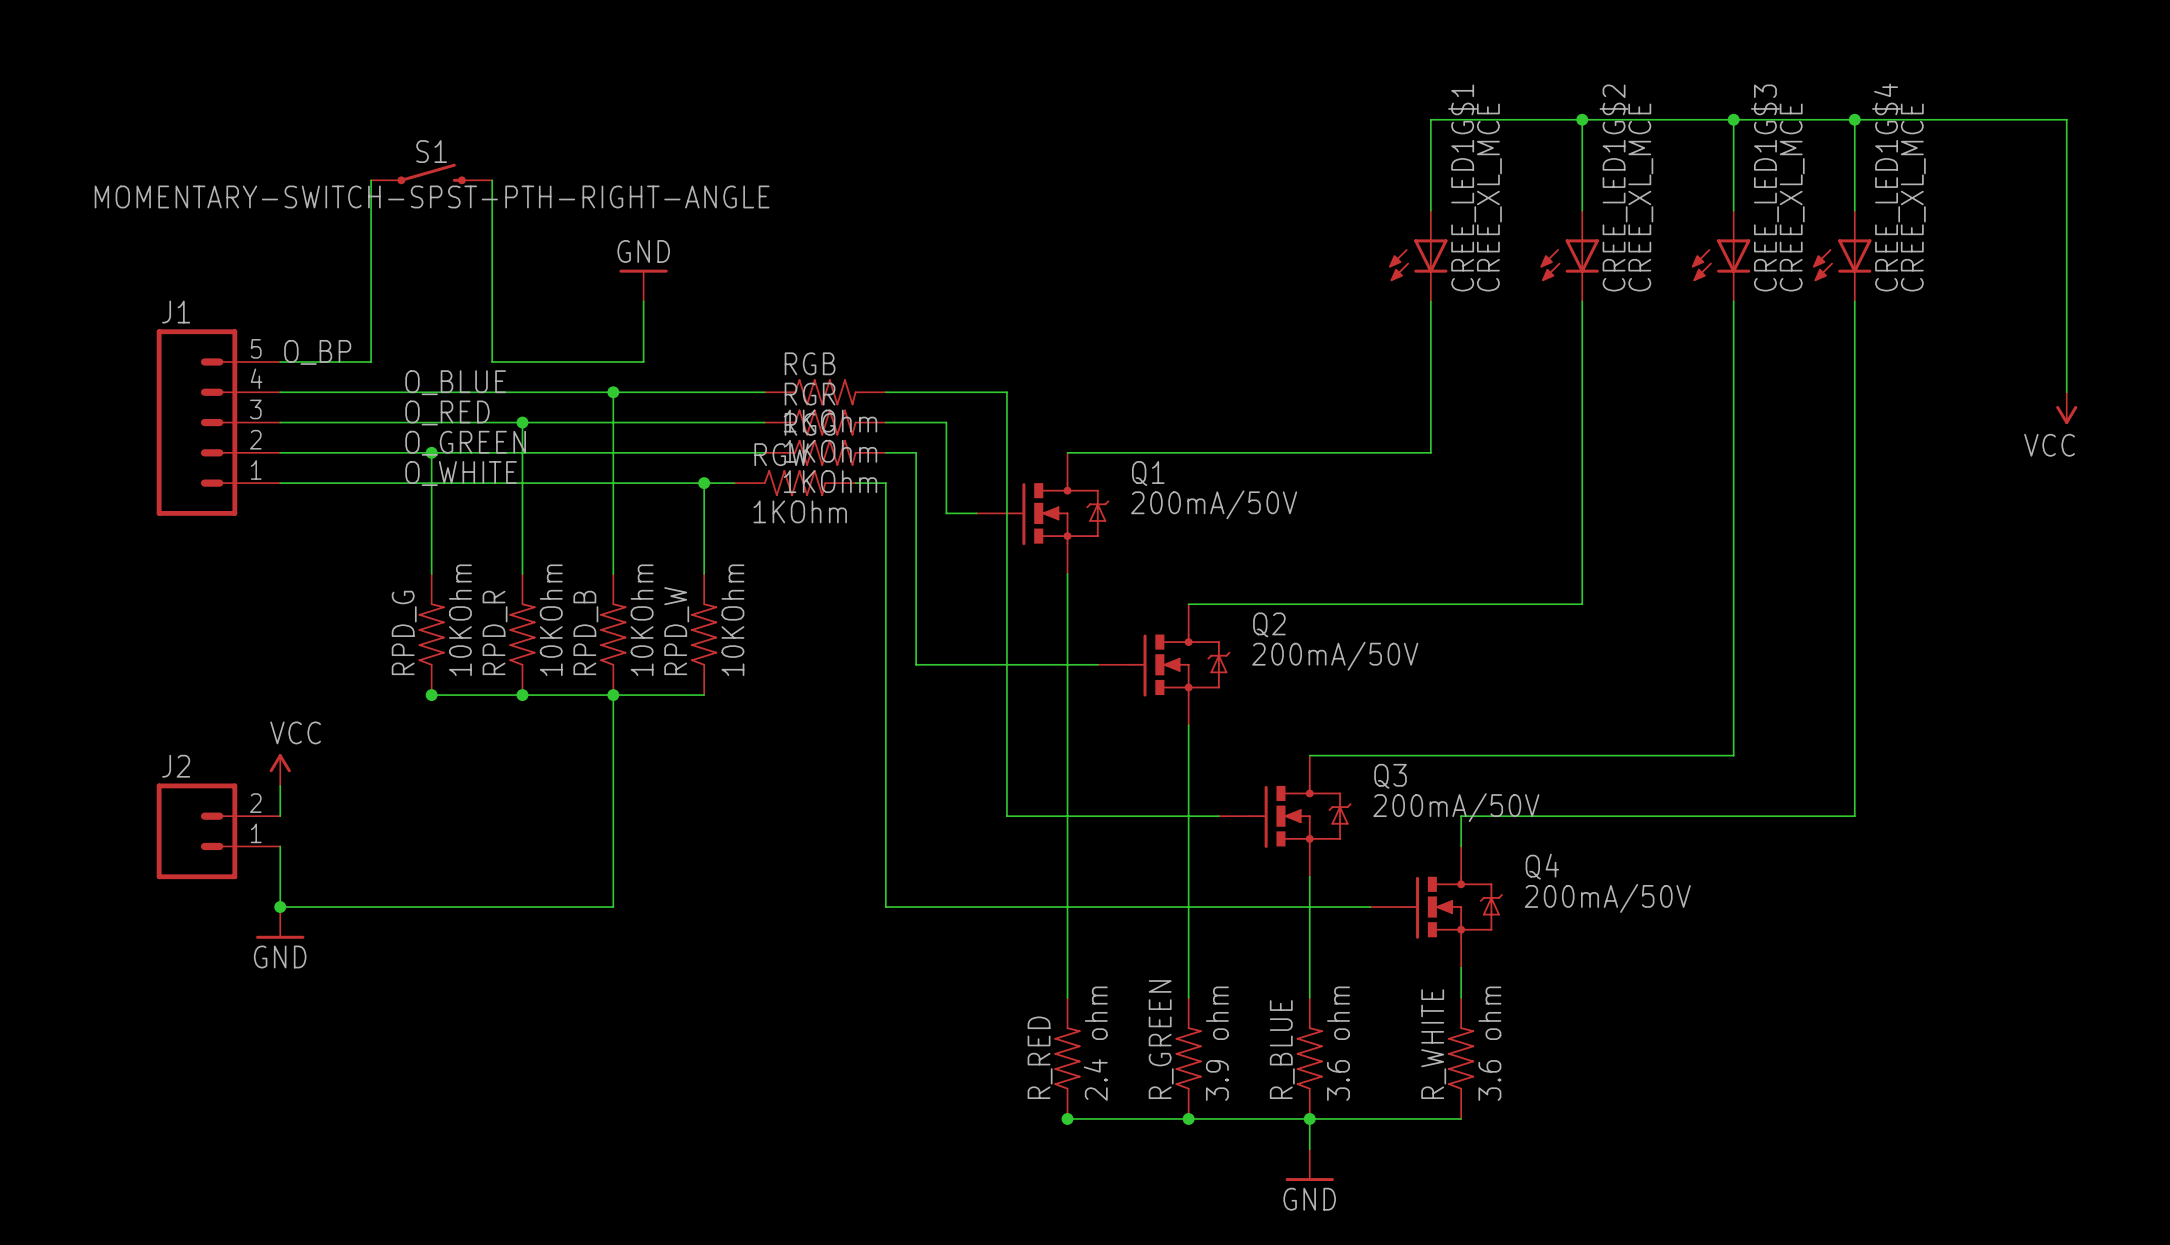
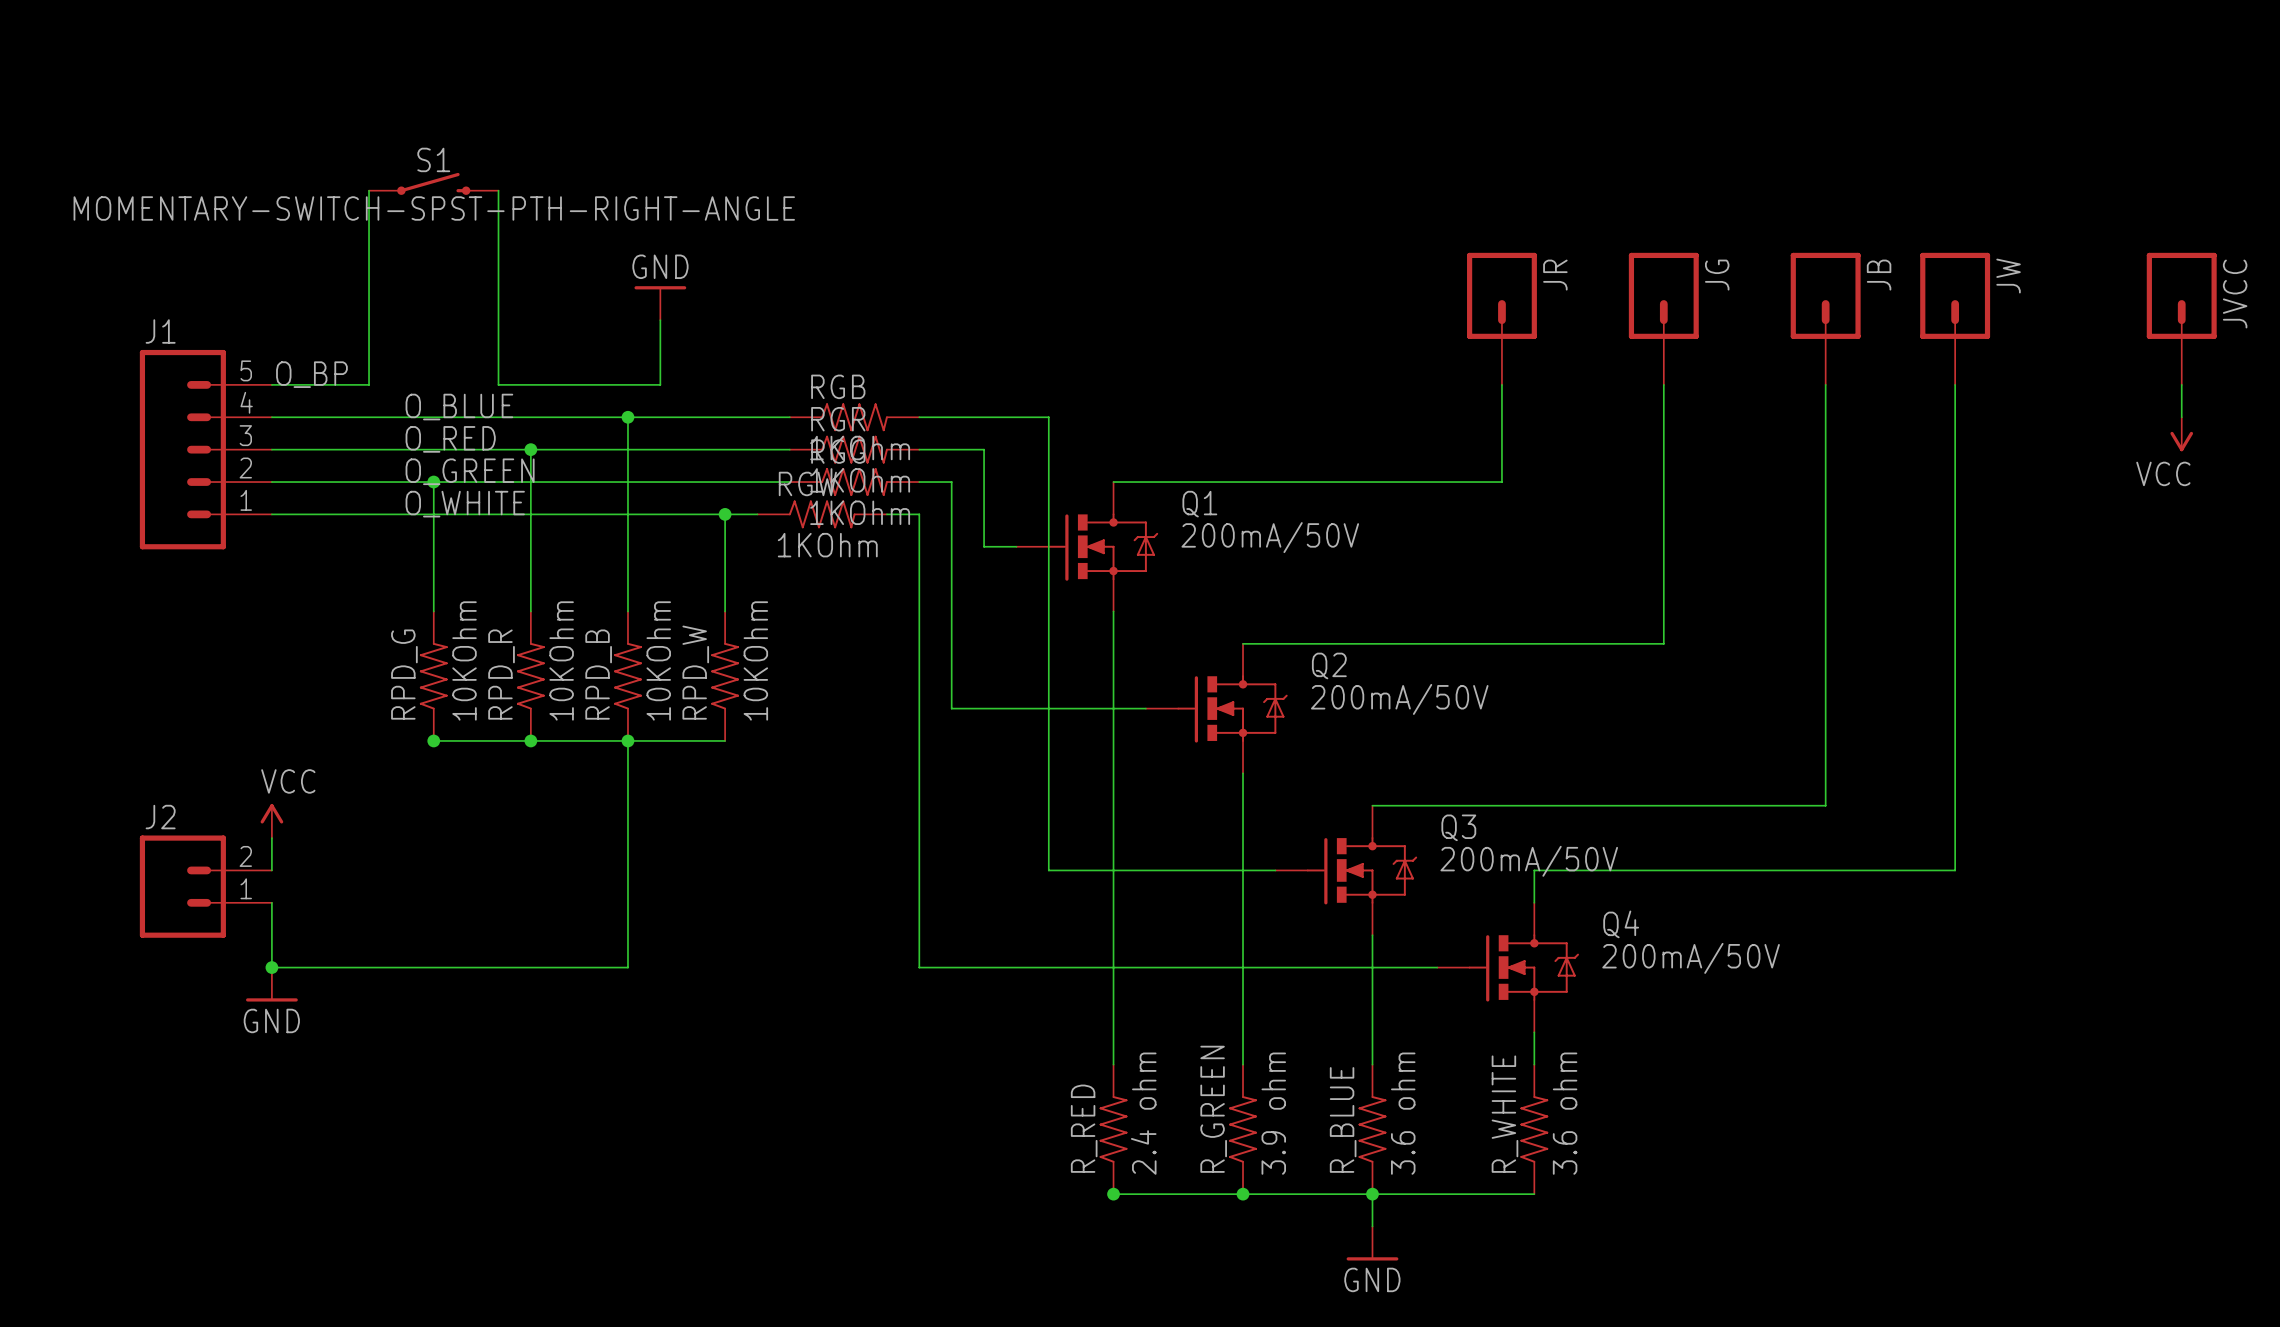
wire: (1582, 119) (1582, 210) -> none
junction: (1582, 119) -> none
wire: (1733, 119) (1733, 210) -> none
junction: (1733, 119) -> none
wire: (1854, 119) (1854, 210) -> none
junction: (1854, 119) -> none
wire: (1430, 210) (1430, 119) (2066, 119) (2066, 361) -> none
CREE_LED1G$1: CREE_XL_MCE (1418, 256) -> none
CREE_LED1G$2: CREE_XL_MCE (1569, 256) -> none
CREE_LED1G$3: CREE_XL_MCE (1721, 256) -> none
CREE_LED1G$4: CREE_XL_MCE (1842, 256) -> none
JR: none -> (1501, 318)
JG: none -> (1663, 318)
JB: none -> (1825, 318)
JW: none -> (1955, 318)
JVCC: none -> (2181, 318)

